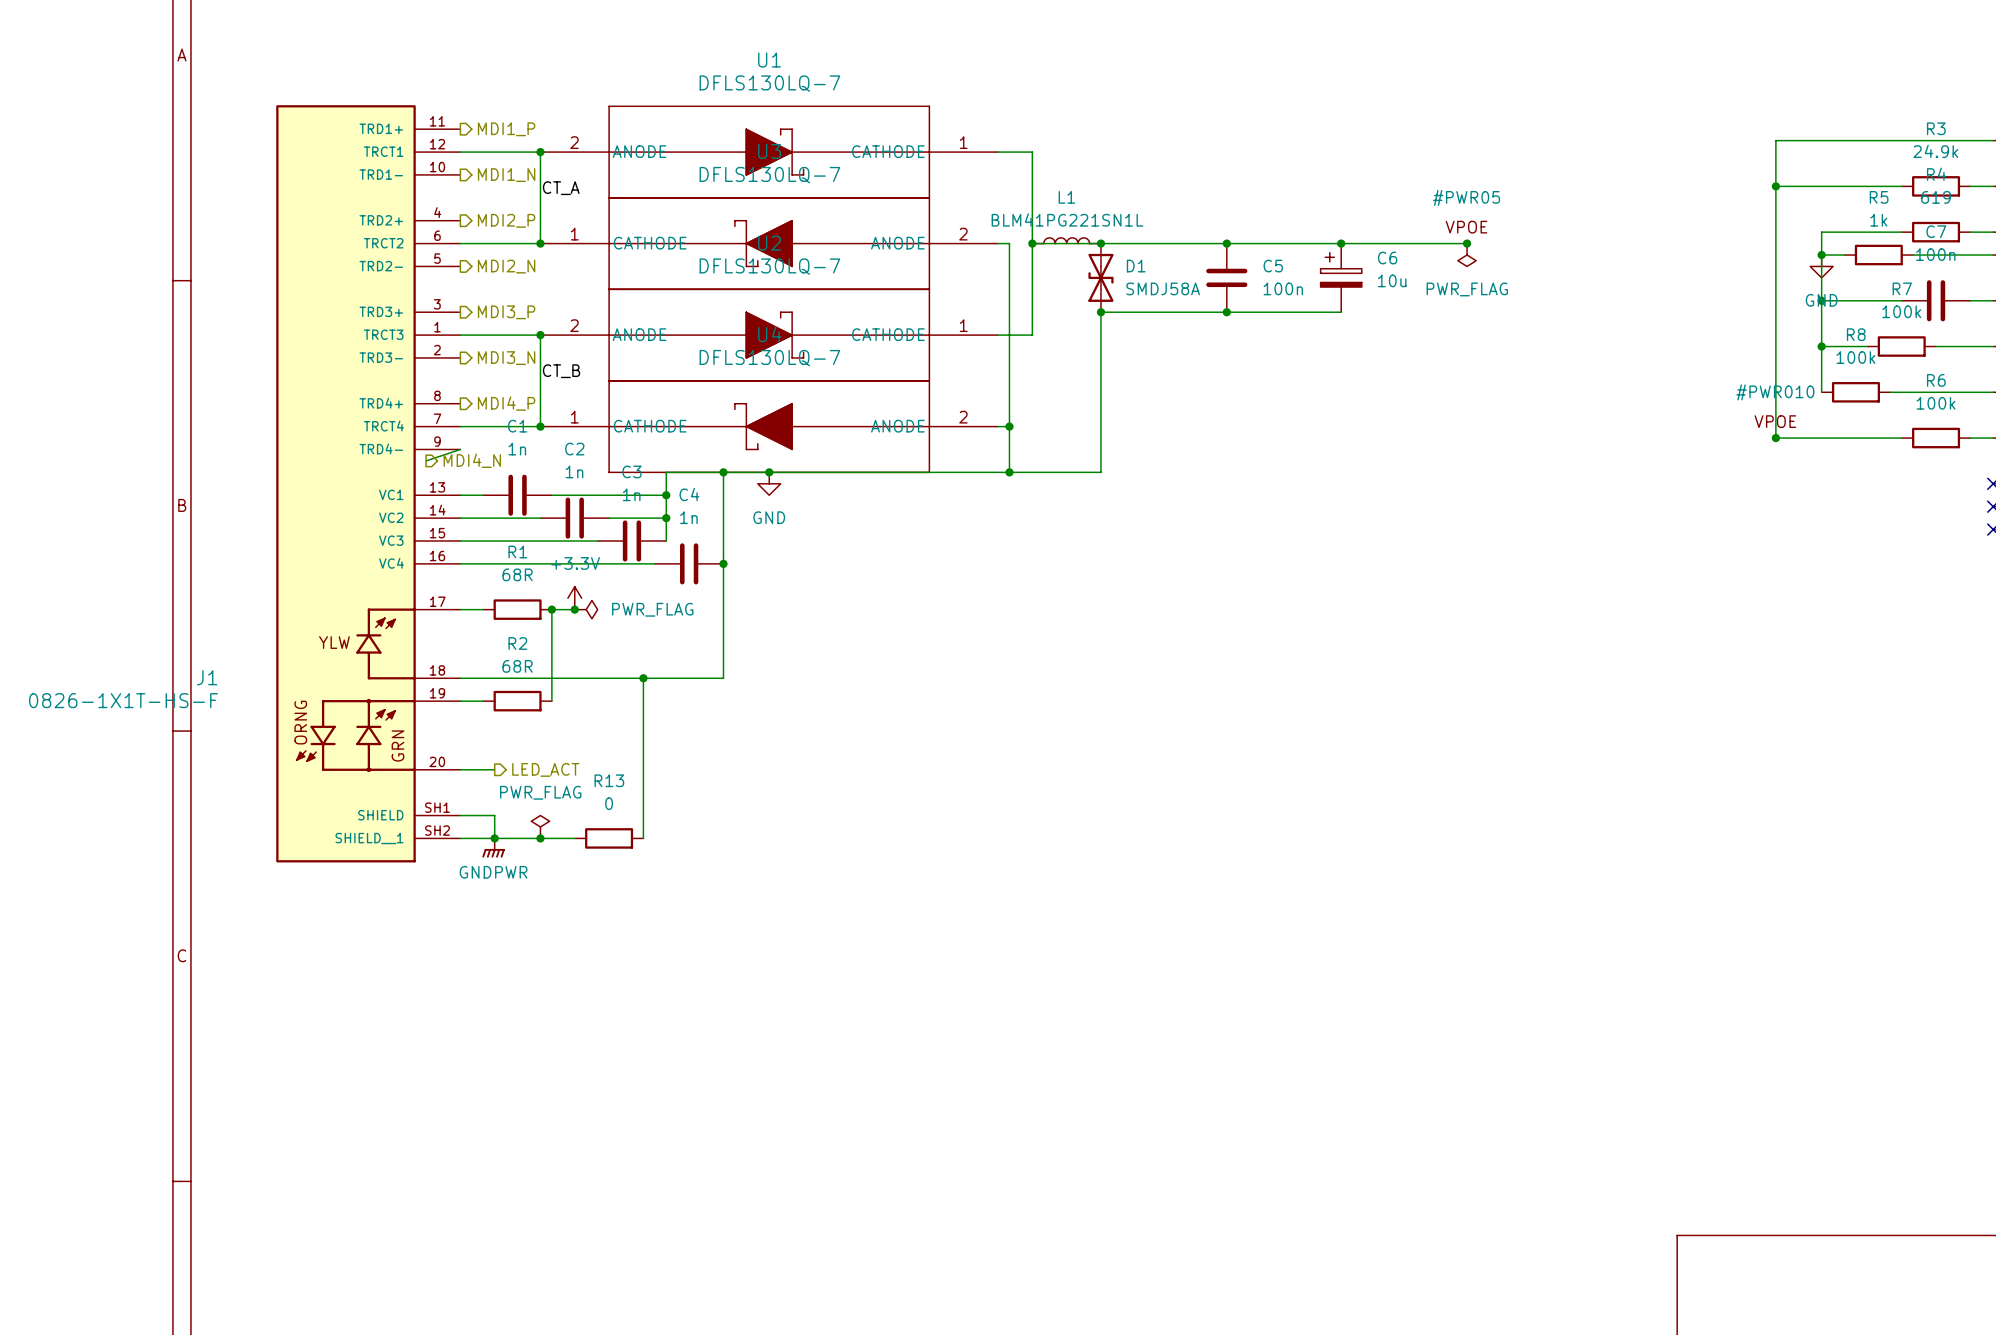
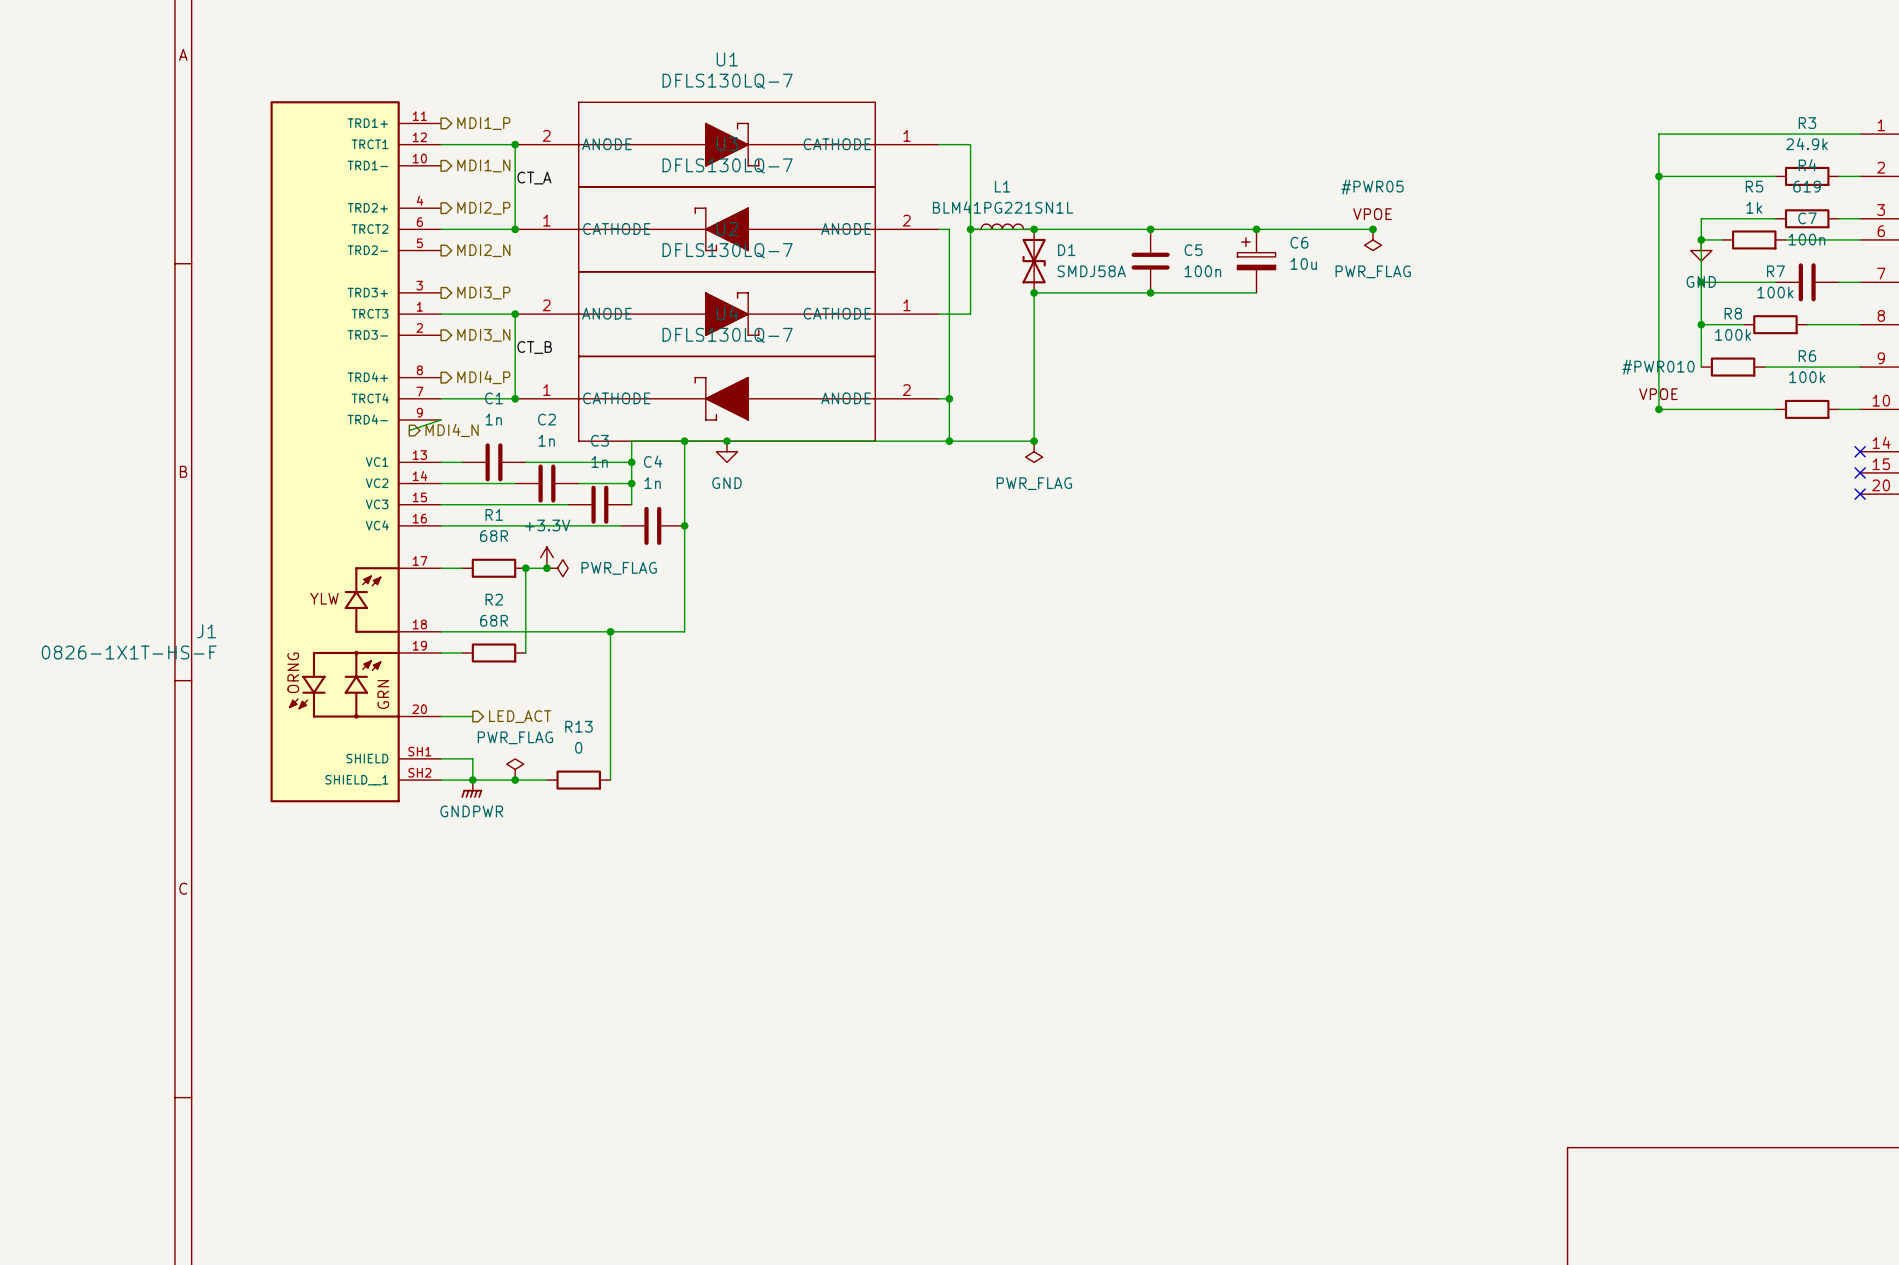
junction: none -> (1034, 441)
power symbol: none -> PWR_FLAG (1034, 451)

